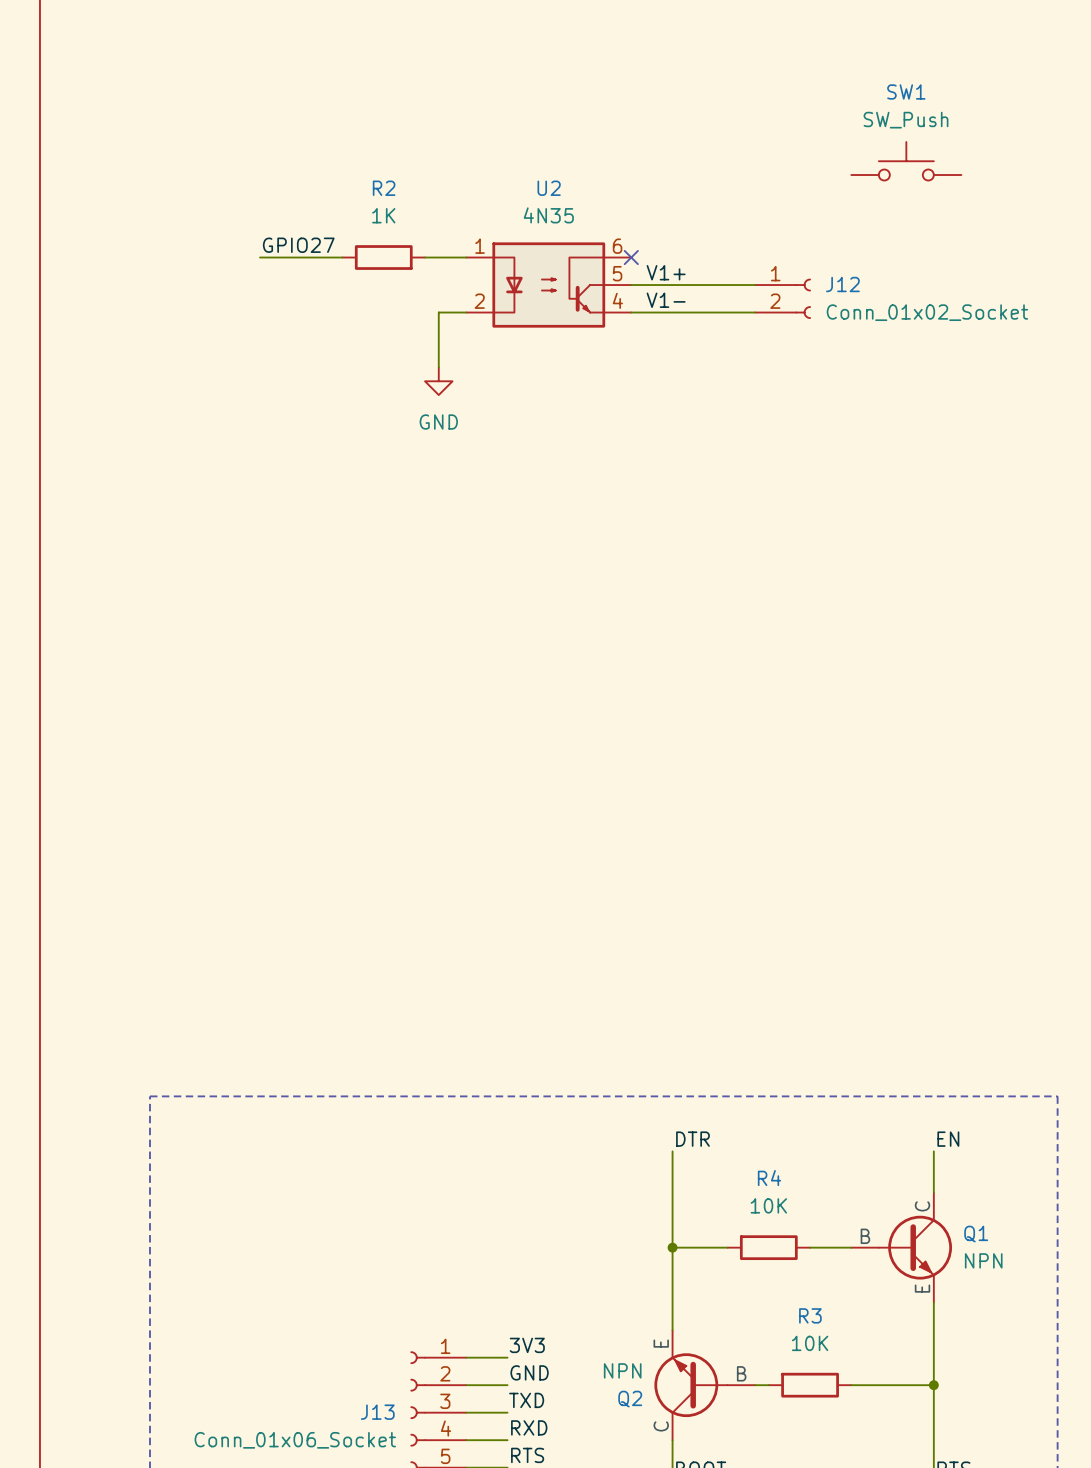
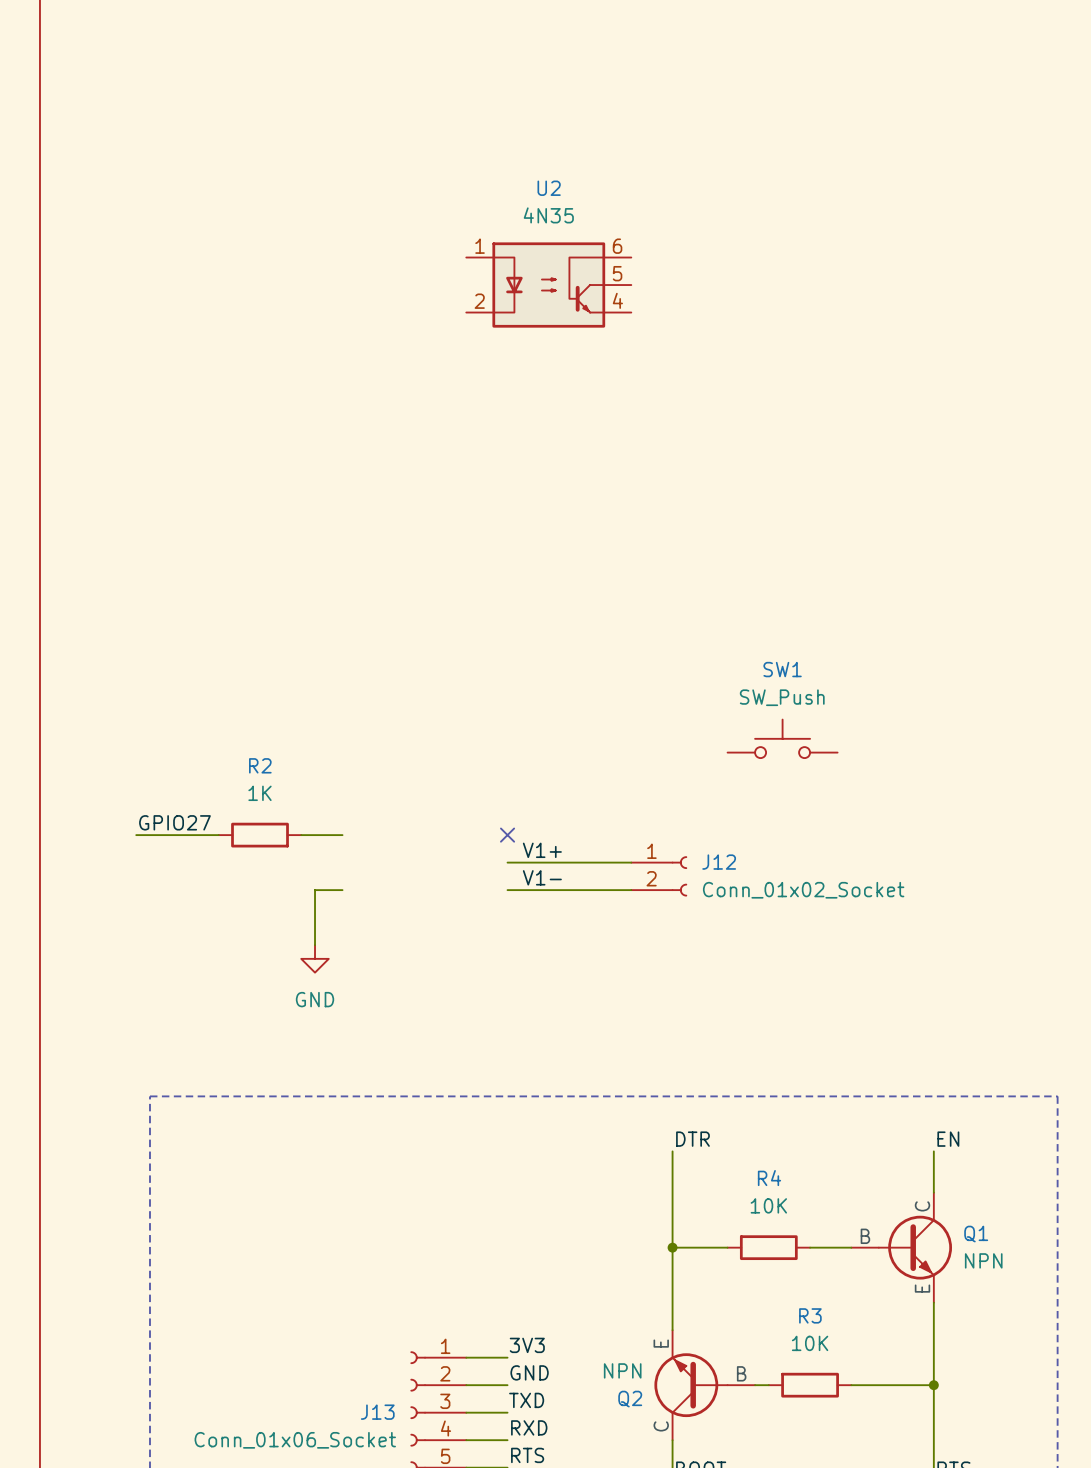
SW1 position: (906, 161) -> (782, 738)
label: GPIO27 (298, 245) -> none
wire: (260, 257) (342, 257) -> none
R2 position: (383, 257) -> (260, 835)
wire: (425, 257) (466, 257) -> none
no-connect mark: (631, 257) -> none
label: V1+ (666, 272) -> none
wire: (631, 285) (755, 285) -> none
J12 position: (782, 298) -> (659, 876)
label: V1- (666, 300) -> none
wire: (466, 312) (438, 312) (438, 367) -> none
wire: (631, 312) (755, 312) -> none
power symbol: GND (438, 381) -> none
label: none -> GPIO27 (174, 822)
wire: none -> (136, 835) (218, 835)
wire: none -> (301, 835) (342, 835)
no-connect mark: none -> (507, 835)
label: none -> V1+ (542, 850)
wire: none -> (507, 862) (631, 862)
label: none -> V1- (542, 877)
wire: none -> (342, 890) (315, 890) (315, 945)
wire: none -> (507, 890) (631, 890)
power symbol: none -> GND (315, 958)

